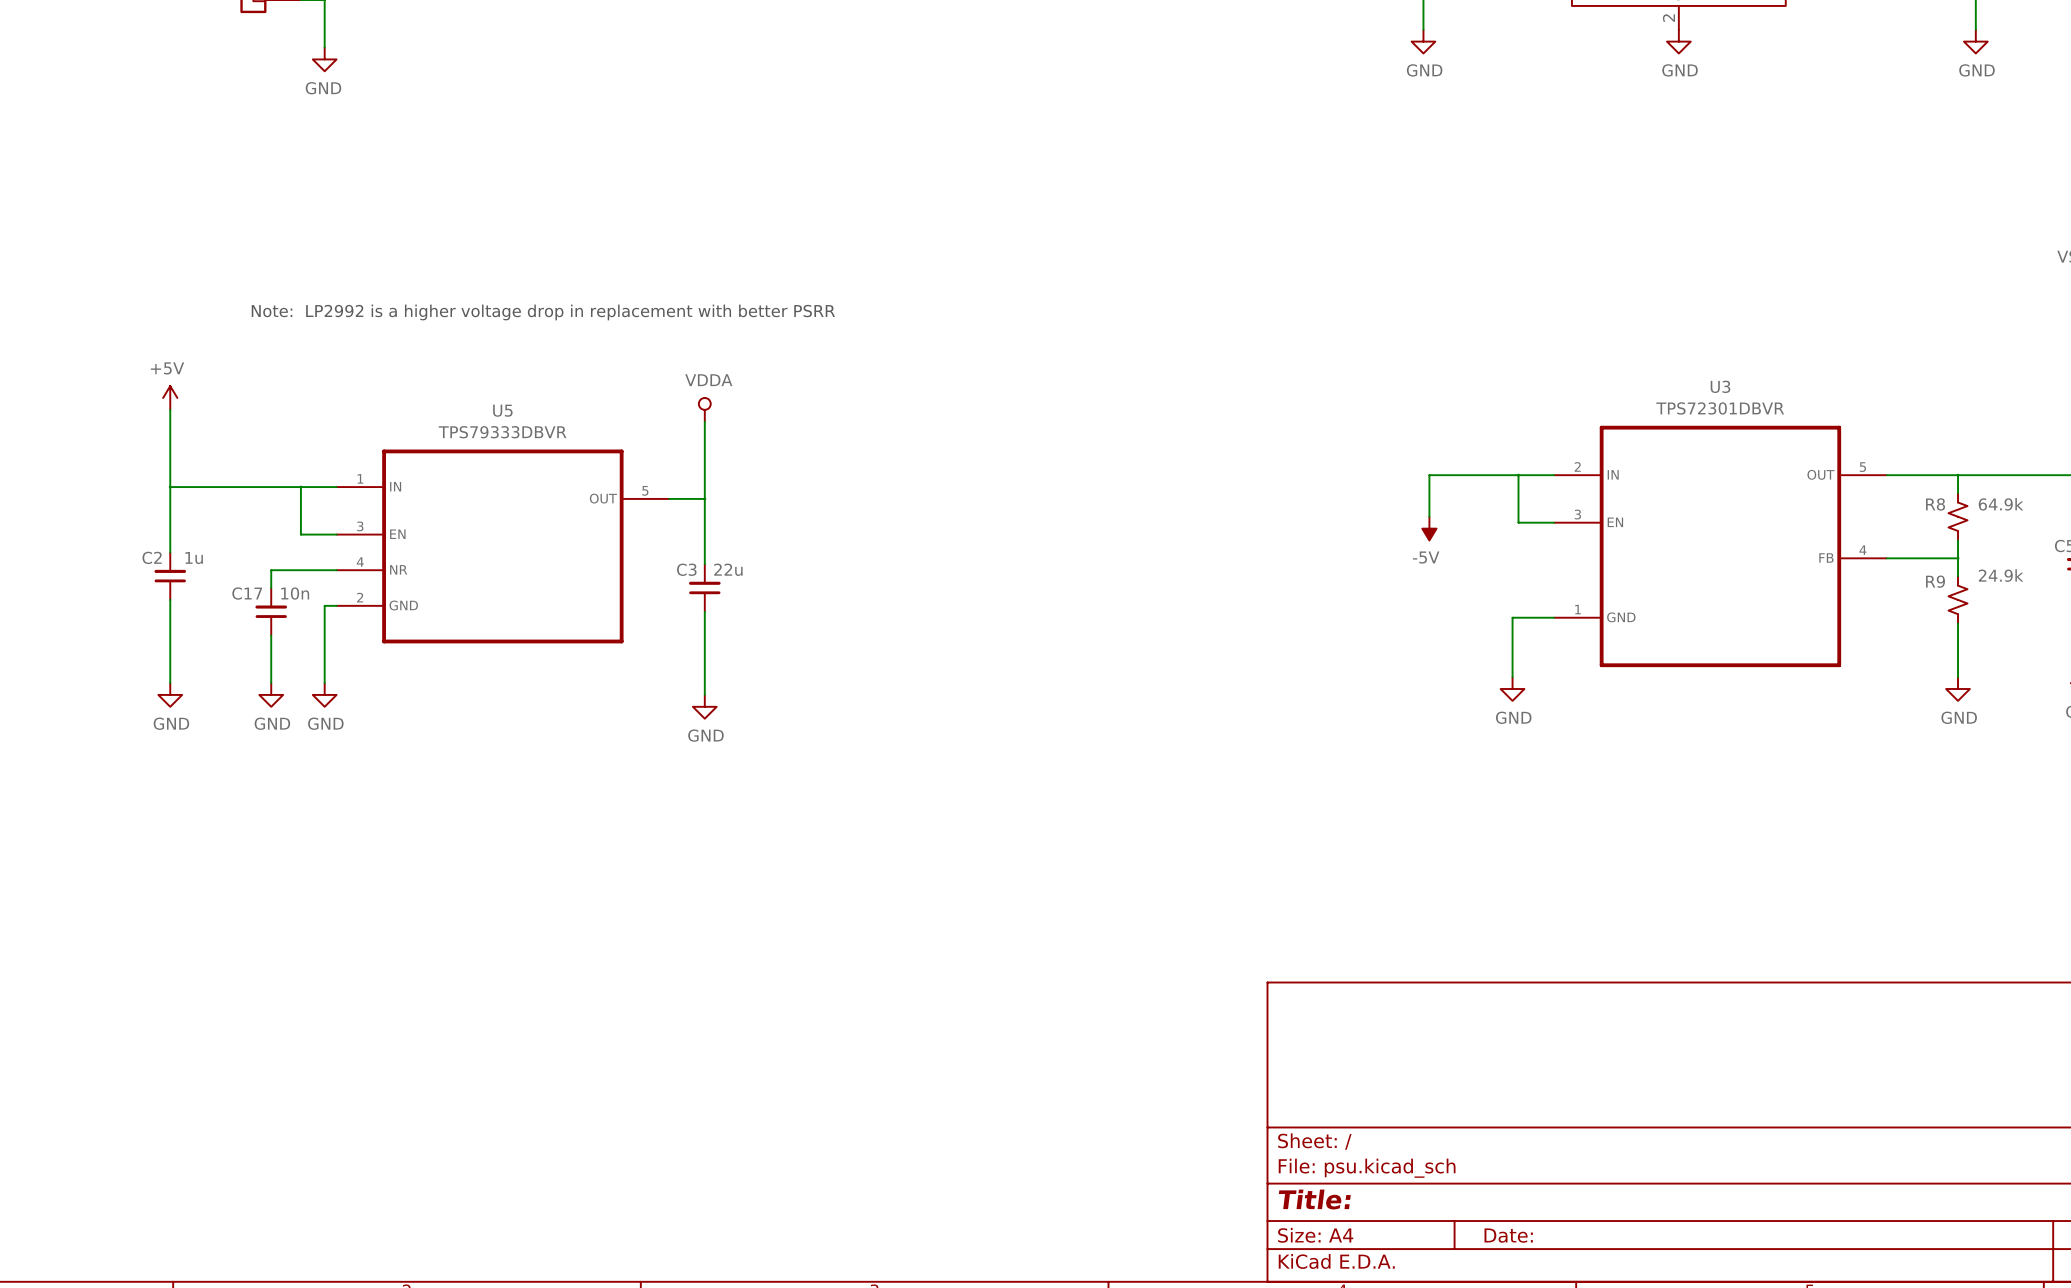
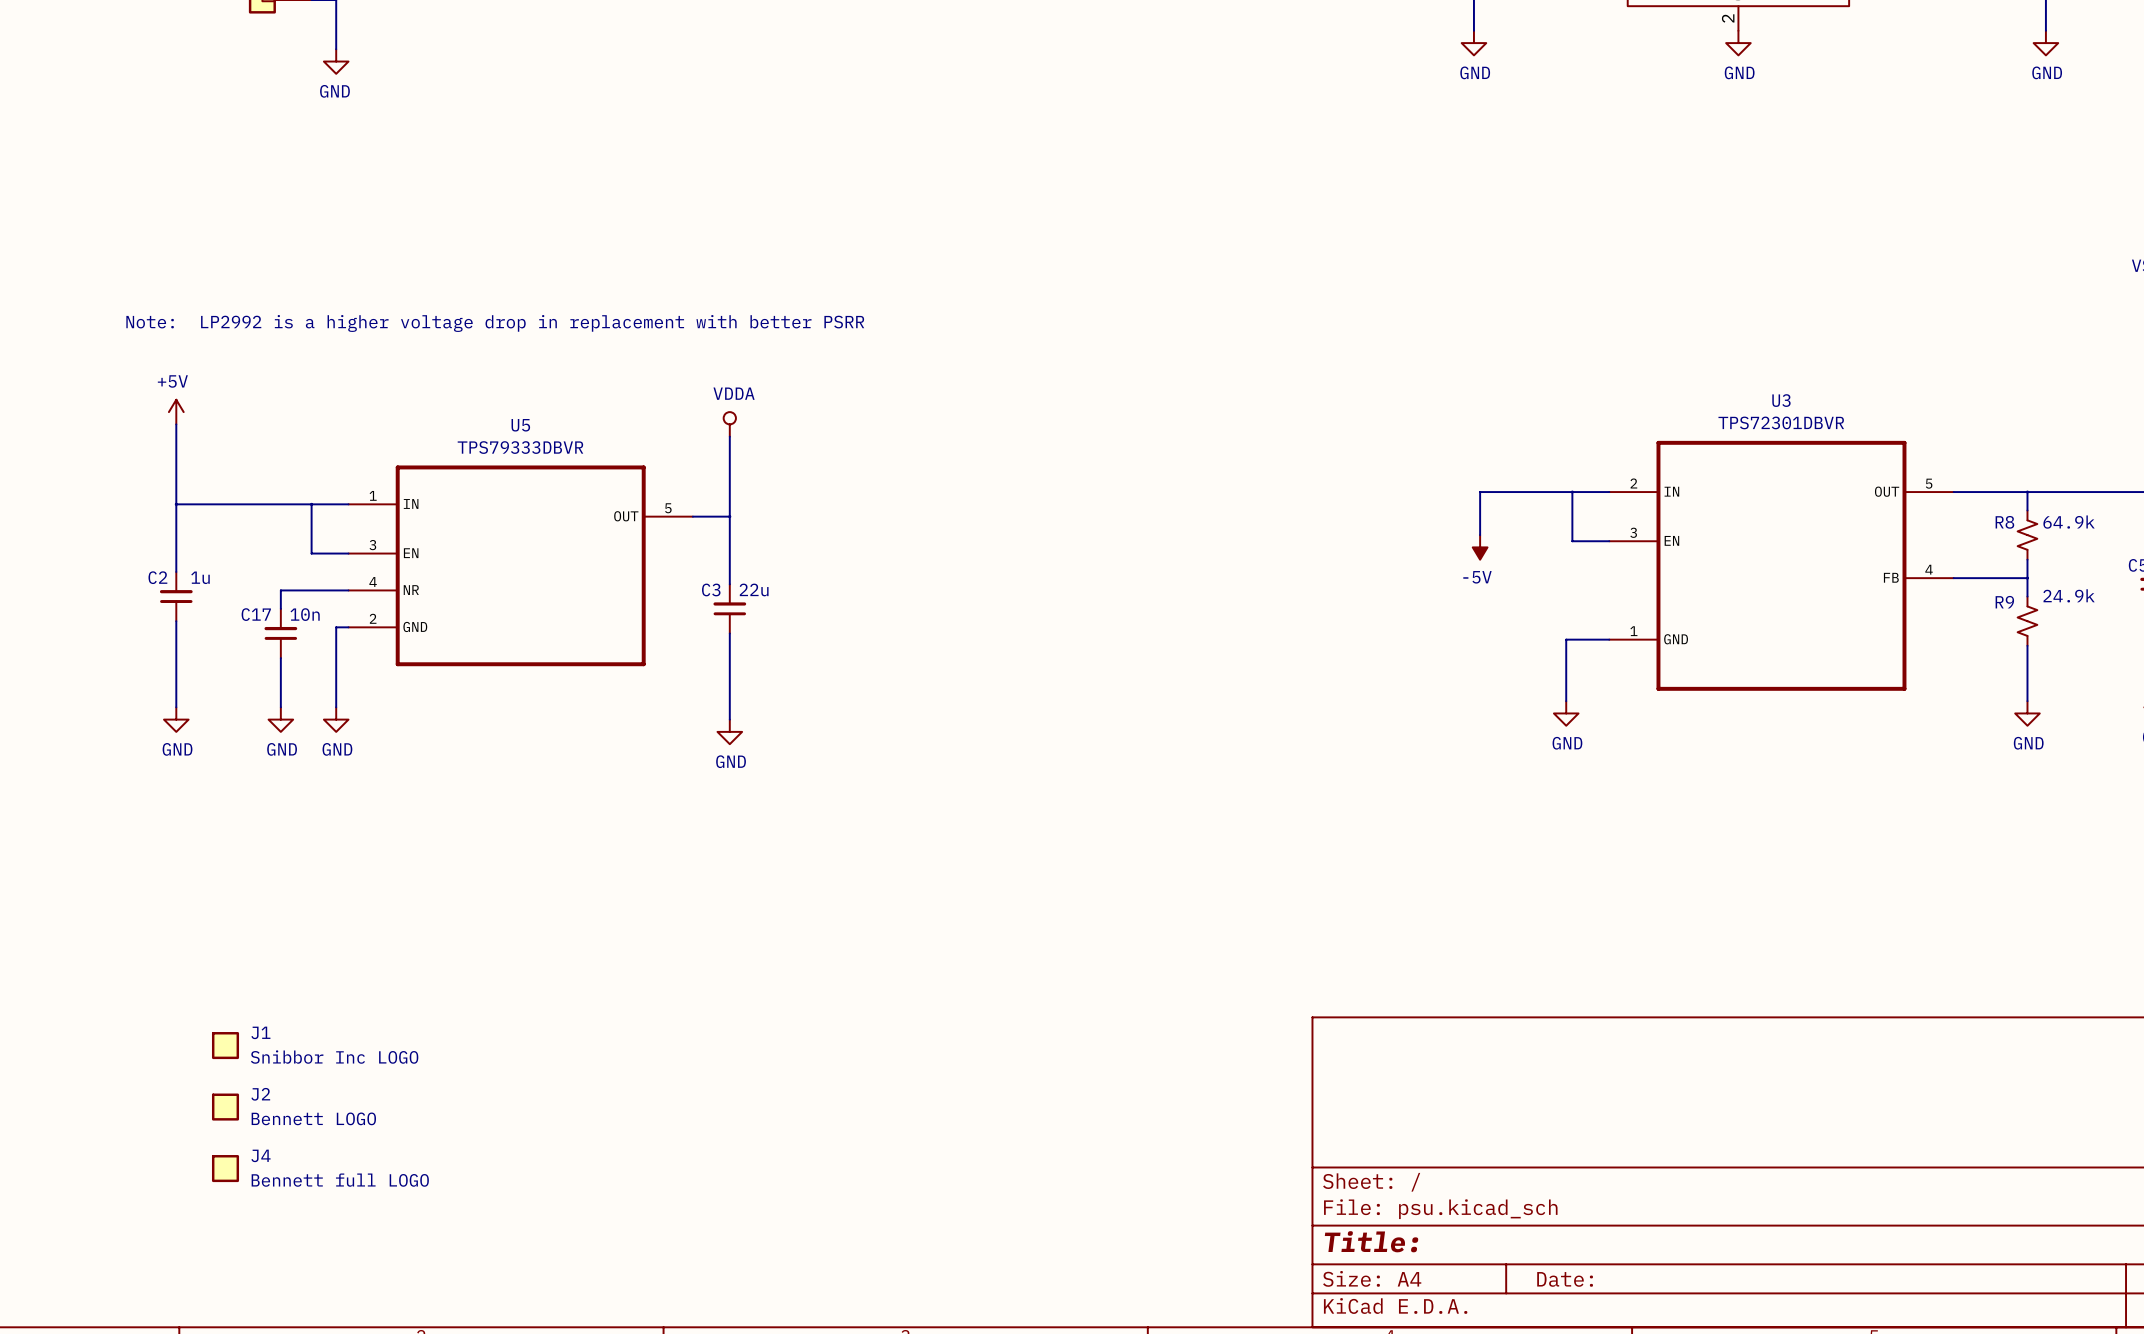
J1: none -> Snibbor Inc LOGO (225, 1045)
J2: none -> Bennett LOGO (225, 1107)
J4: none -> Bennett full LOGO (225, 1168)

